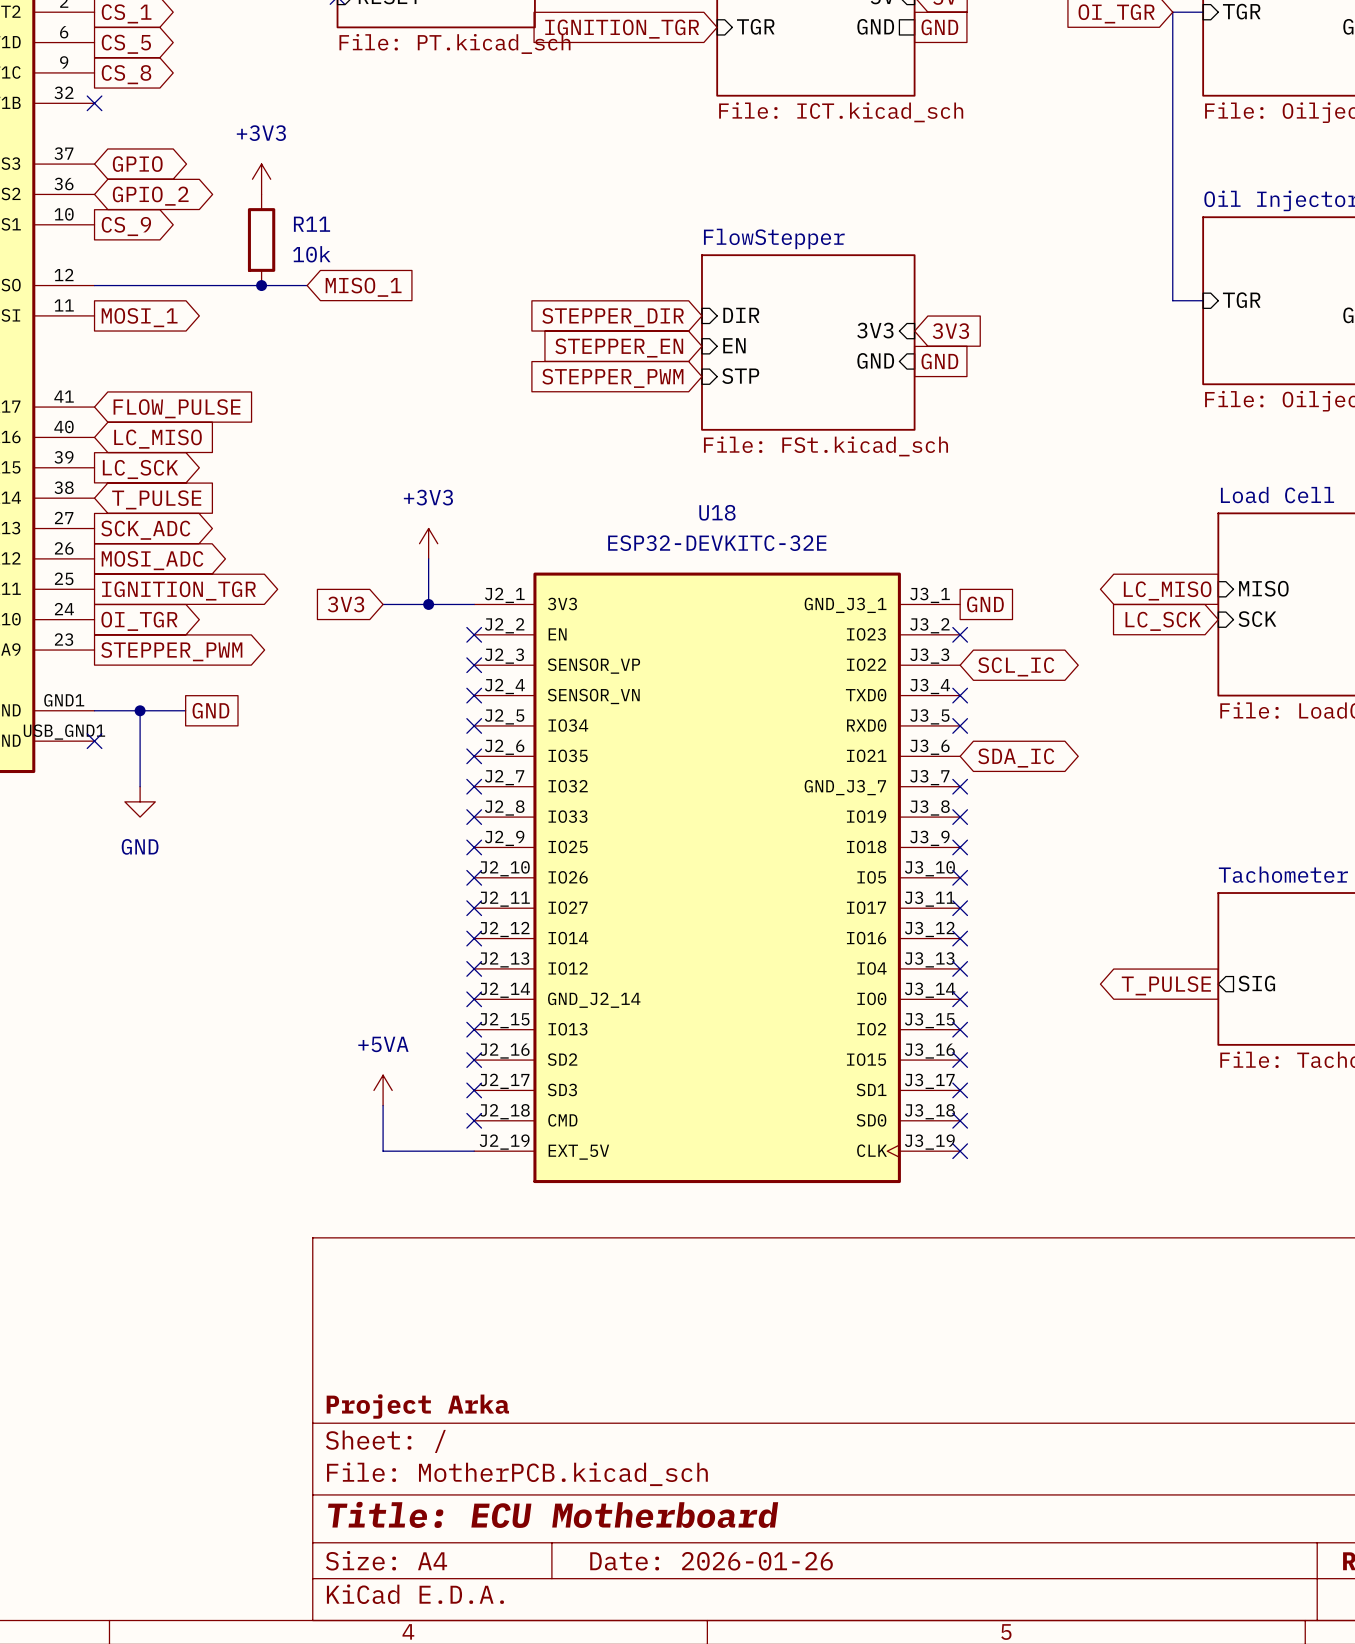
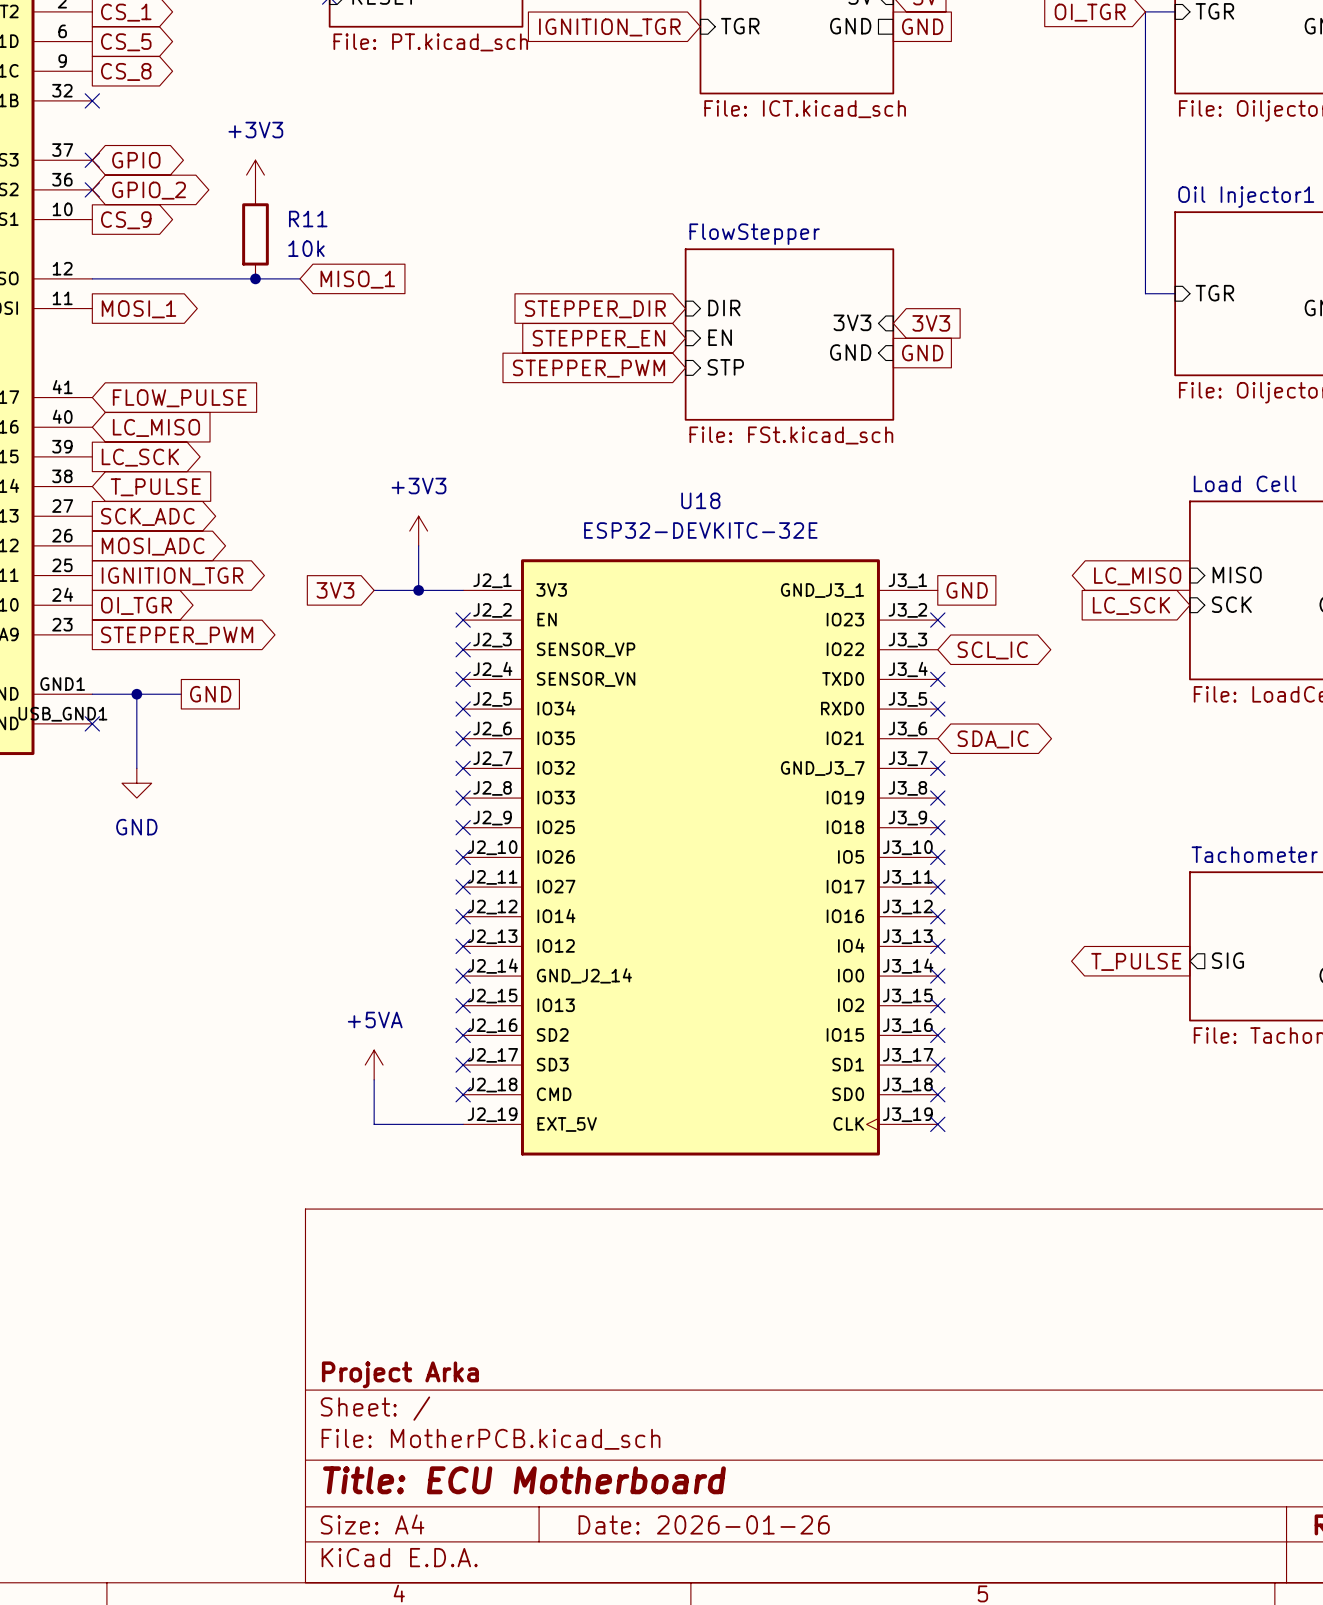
no-connect mark: none -> (92, 160)
no-connect mark: none -> (92, 189)

